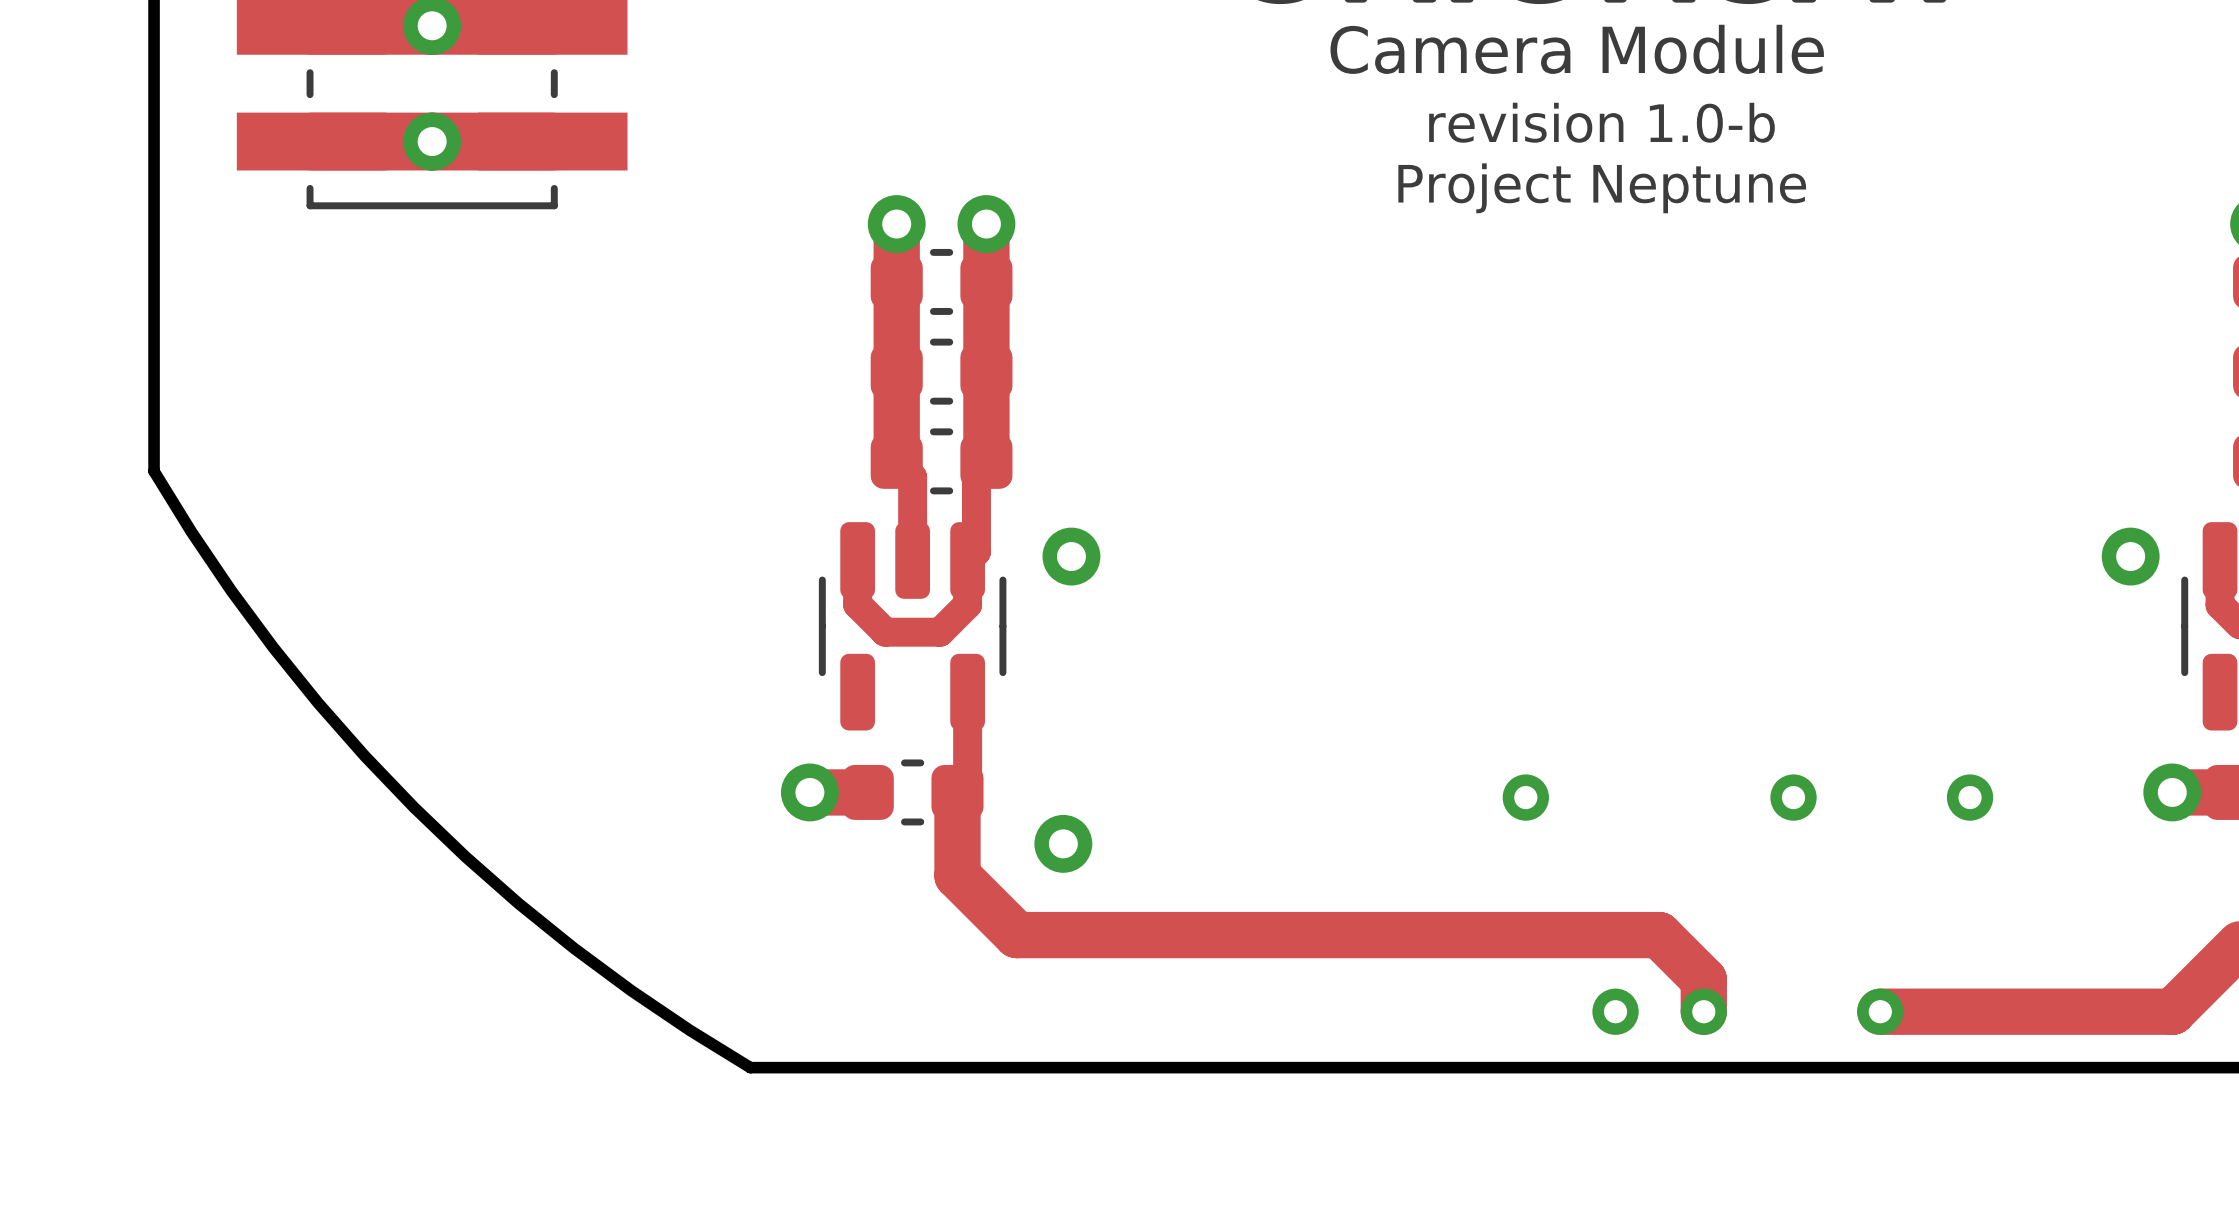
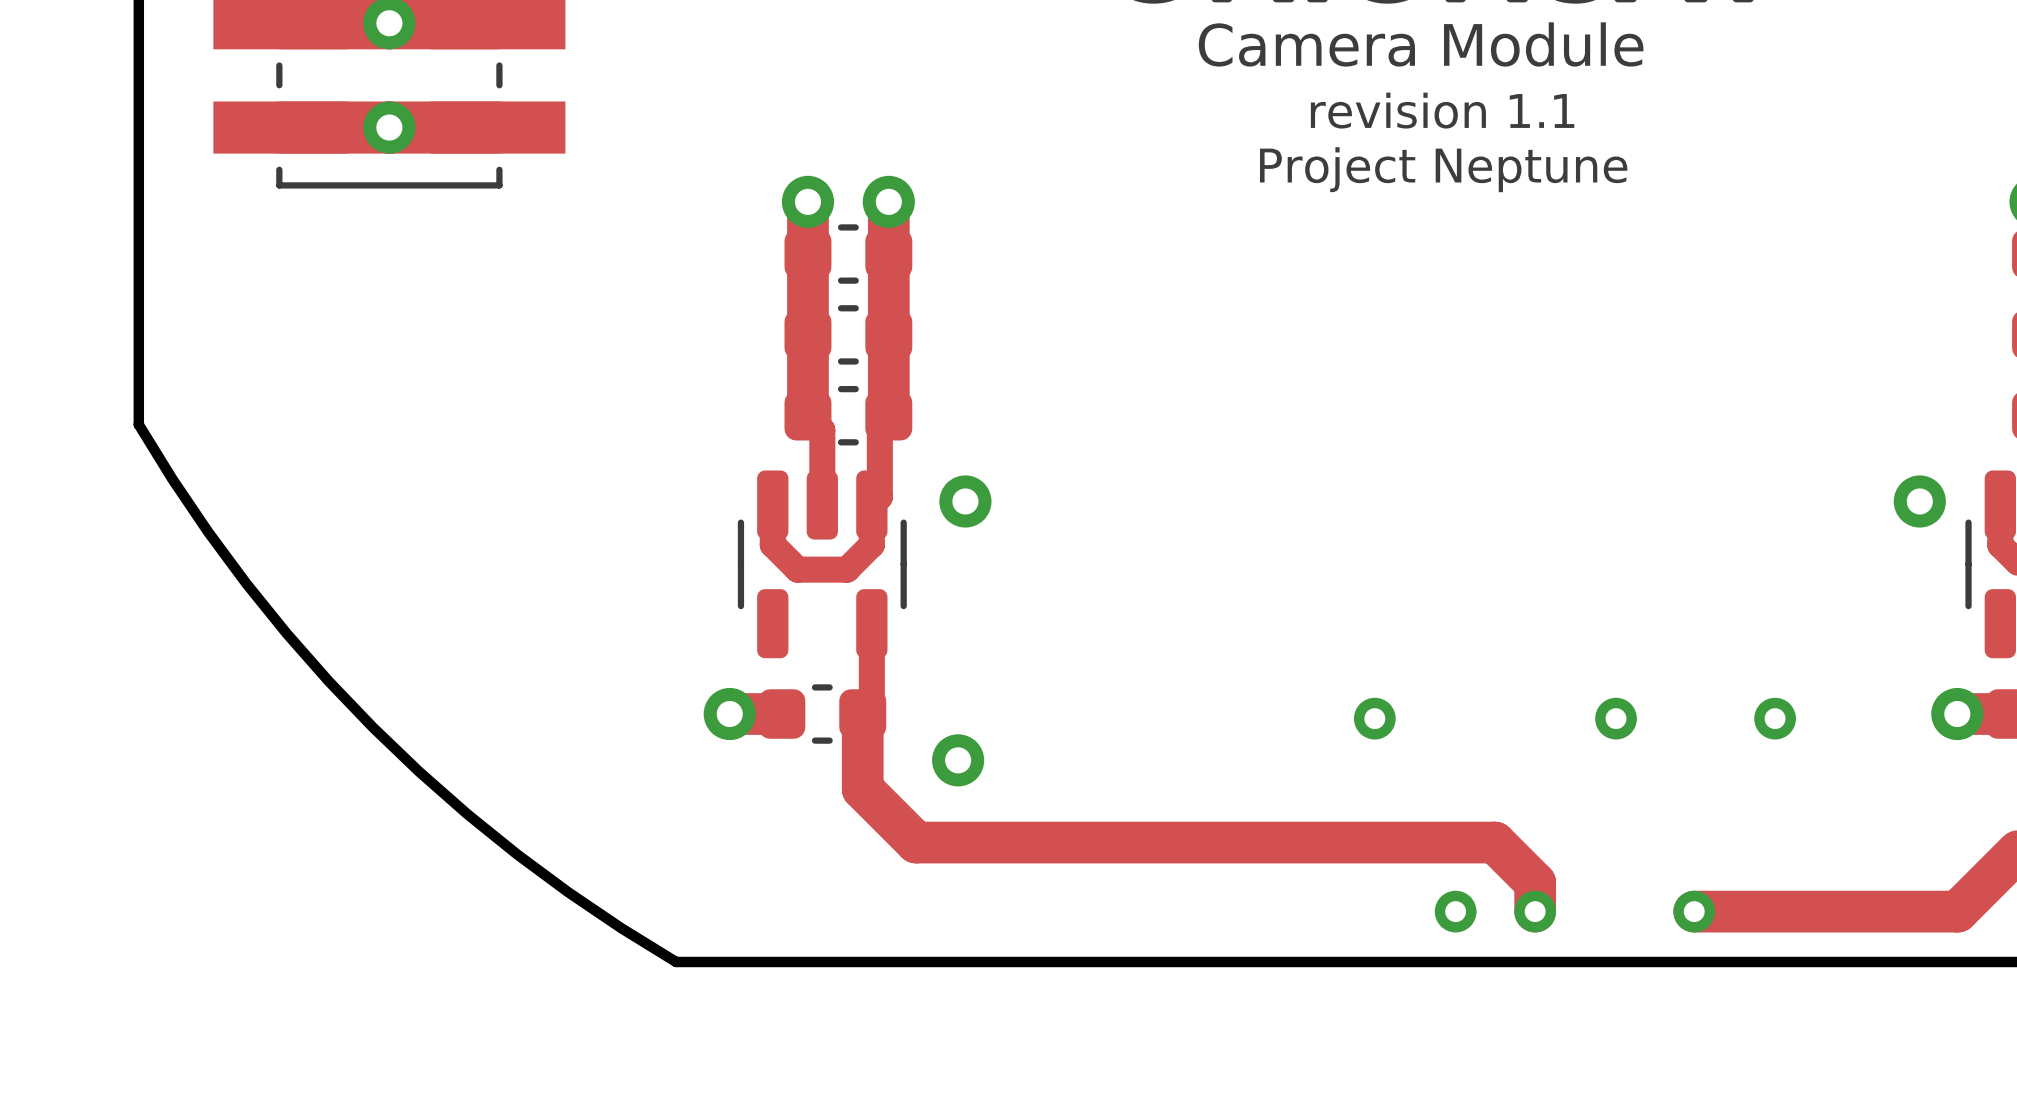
text: revision 1.0-b (1601, 122) -> revision 1.1 (1442, 110)

